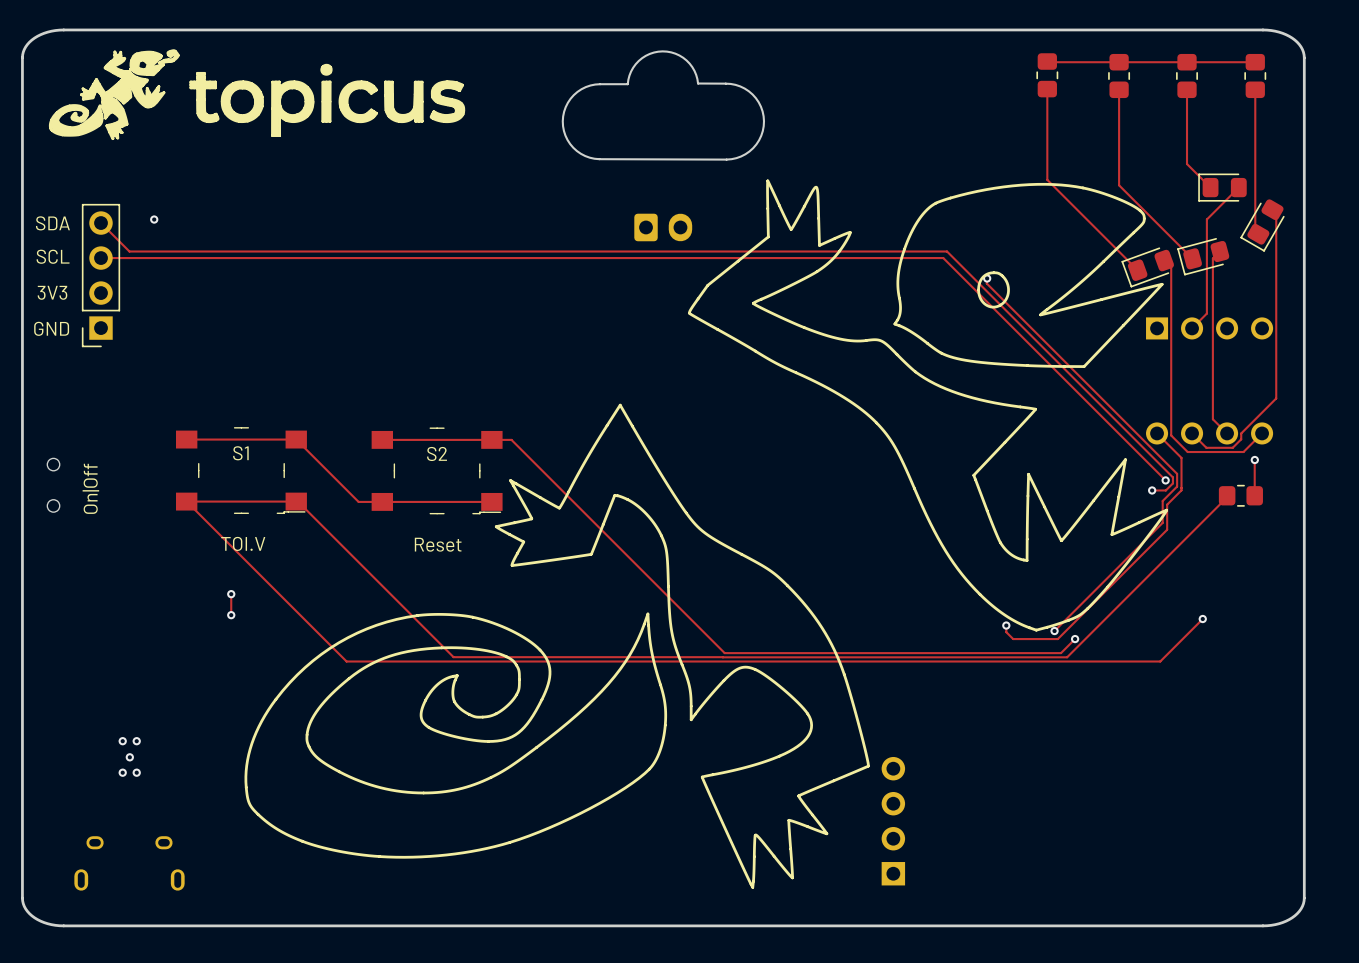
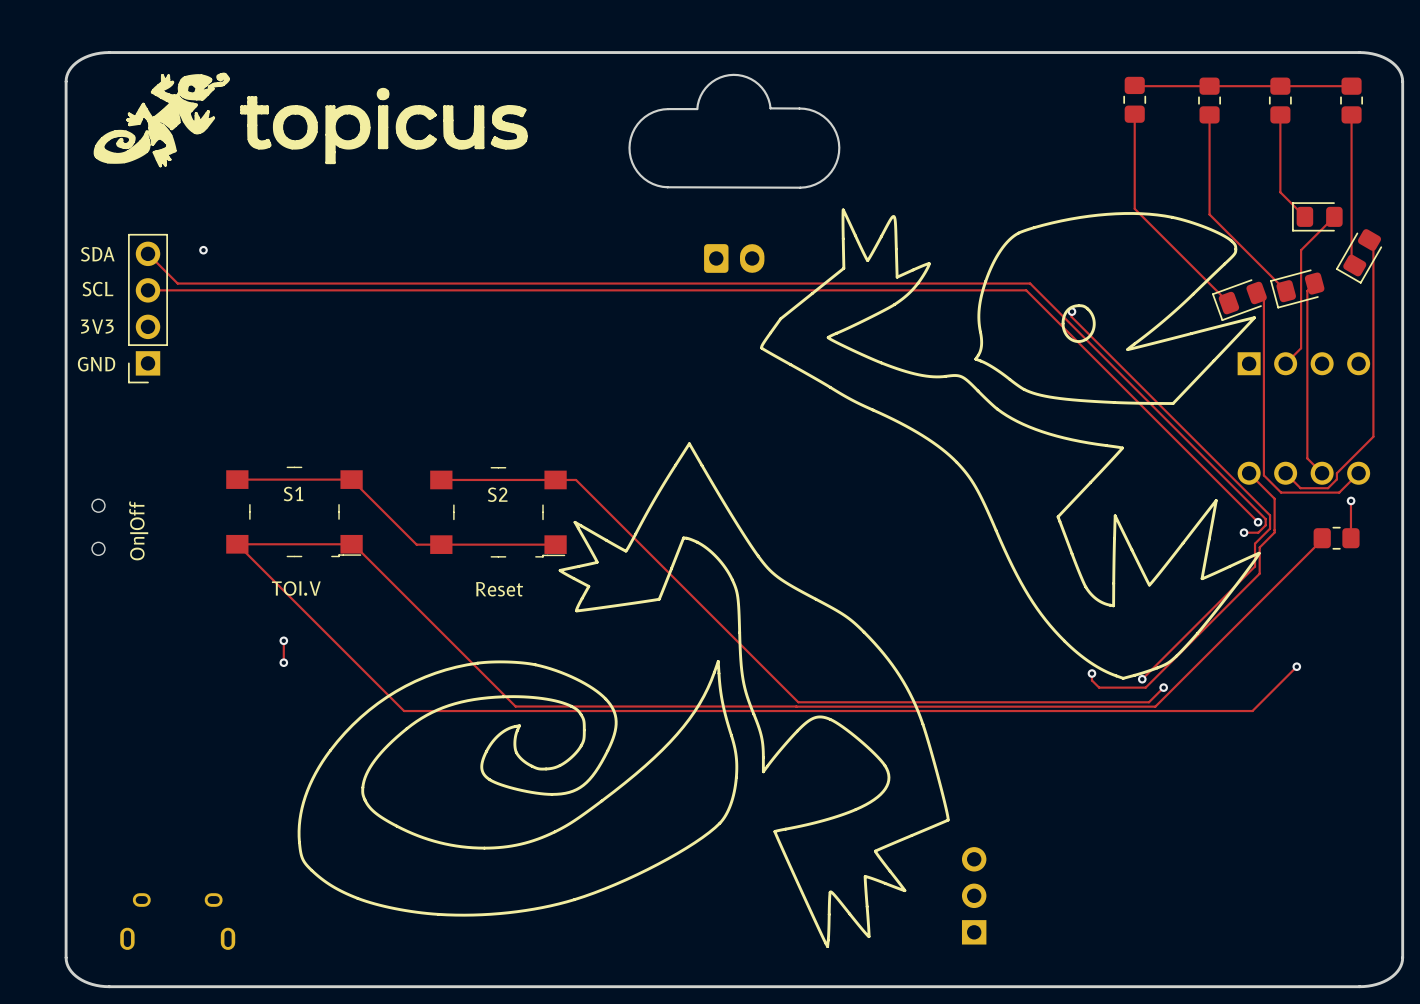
via: (122, 741) -> none
via: (136, 741) -> none
via: (129, 757) -> none
via: (122, 772) -> none
via: (136, 772) -> none
part: (893, 821) -> none

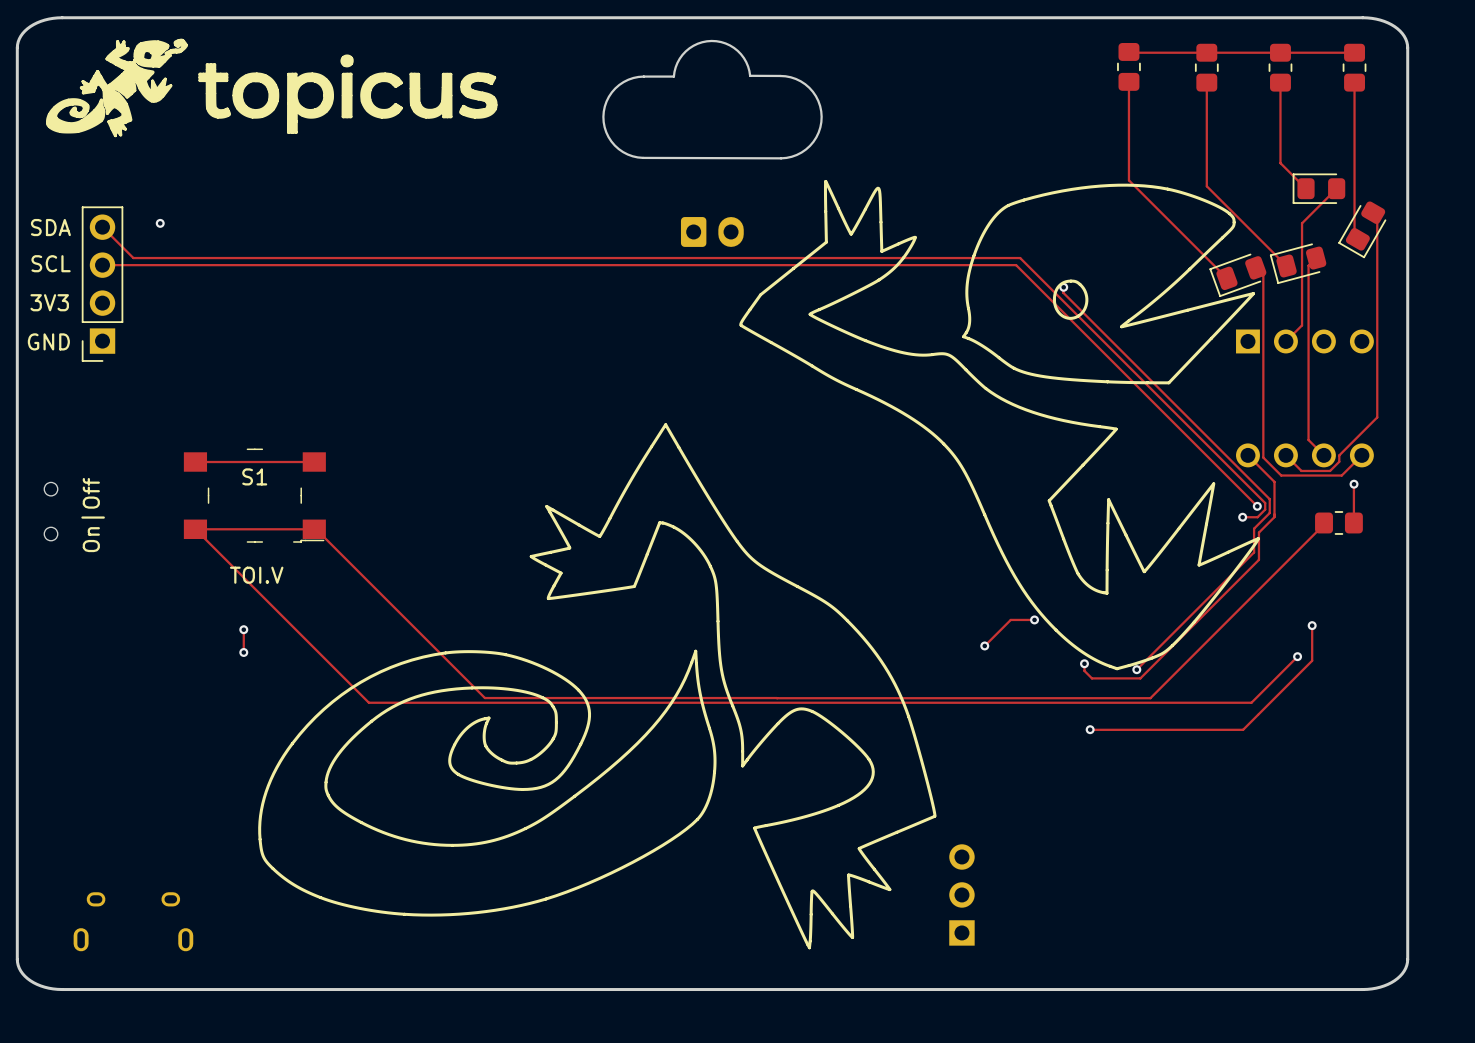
track: (351, 479) (416, 544) (555, 544) -> none
track: (441, 479) (576, 479) (798, 702) (1149, 702) (1163, 687) -> none
S2: (498, 512) -> none
text: Reset (499, 589) -> none
track: none -> (1034, 619) (1010, 619) (984, 645)
via: none -> (1034, 619)
track: none -> (1312, 625) (1312, 660) (1243, 729) (1090, 729)
via: none -> (1312, 625)
via: none -> (984, 645)
via: (1163, 687) -> none
via: none -> (1090, 729)

